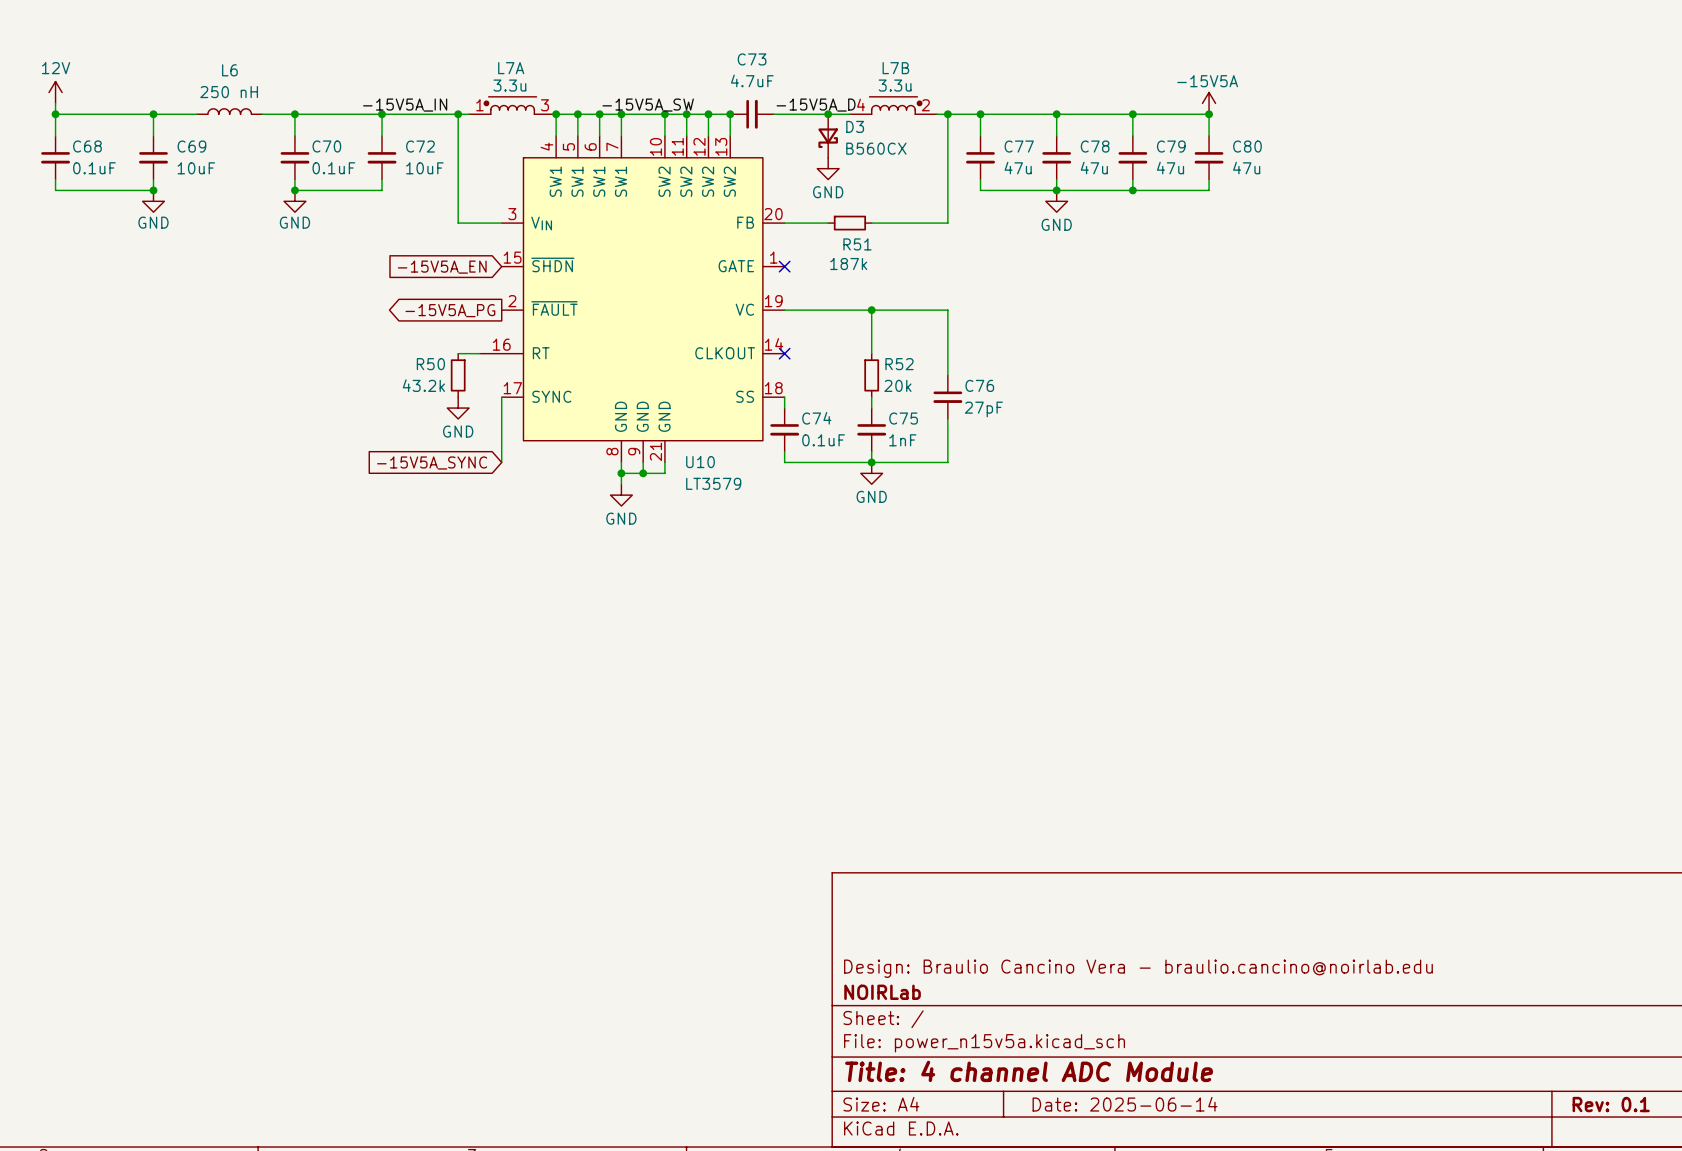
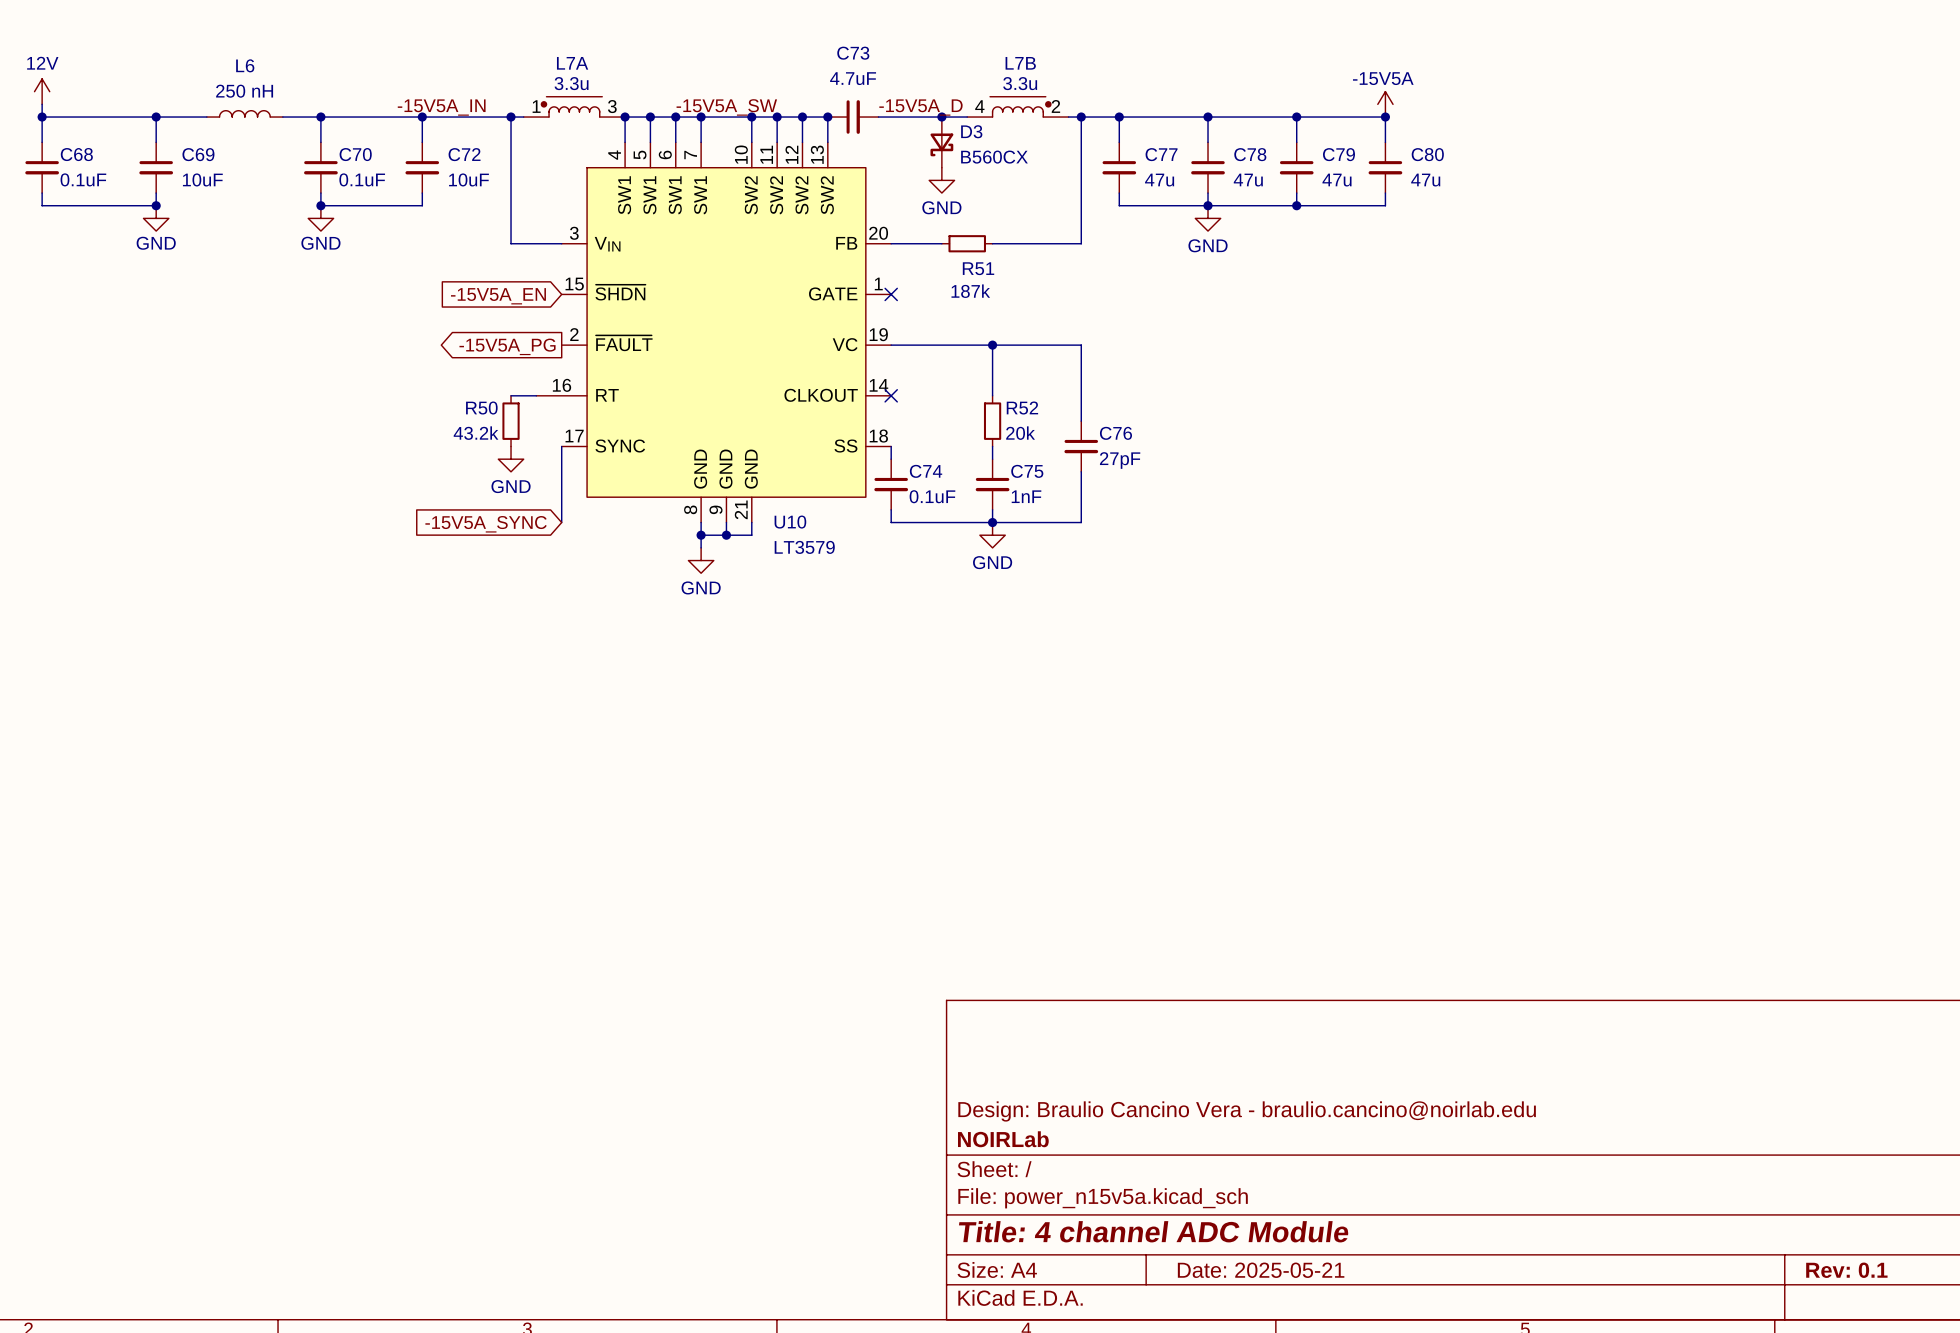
title block: Date: 2025-06-14 (1124, 1104) -> Date: 2025-05-21 (1261, 1270)

